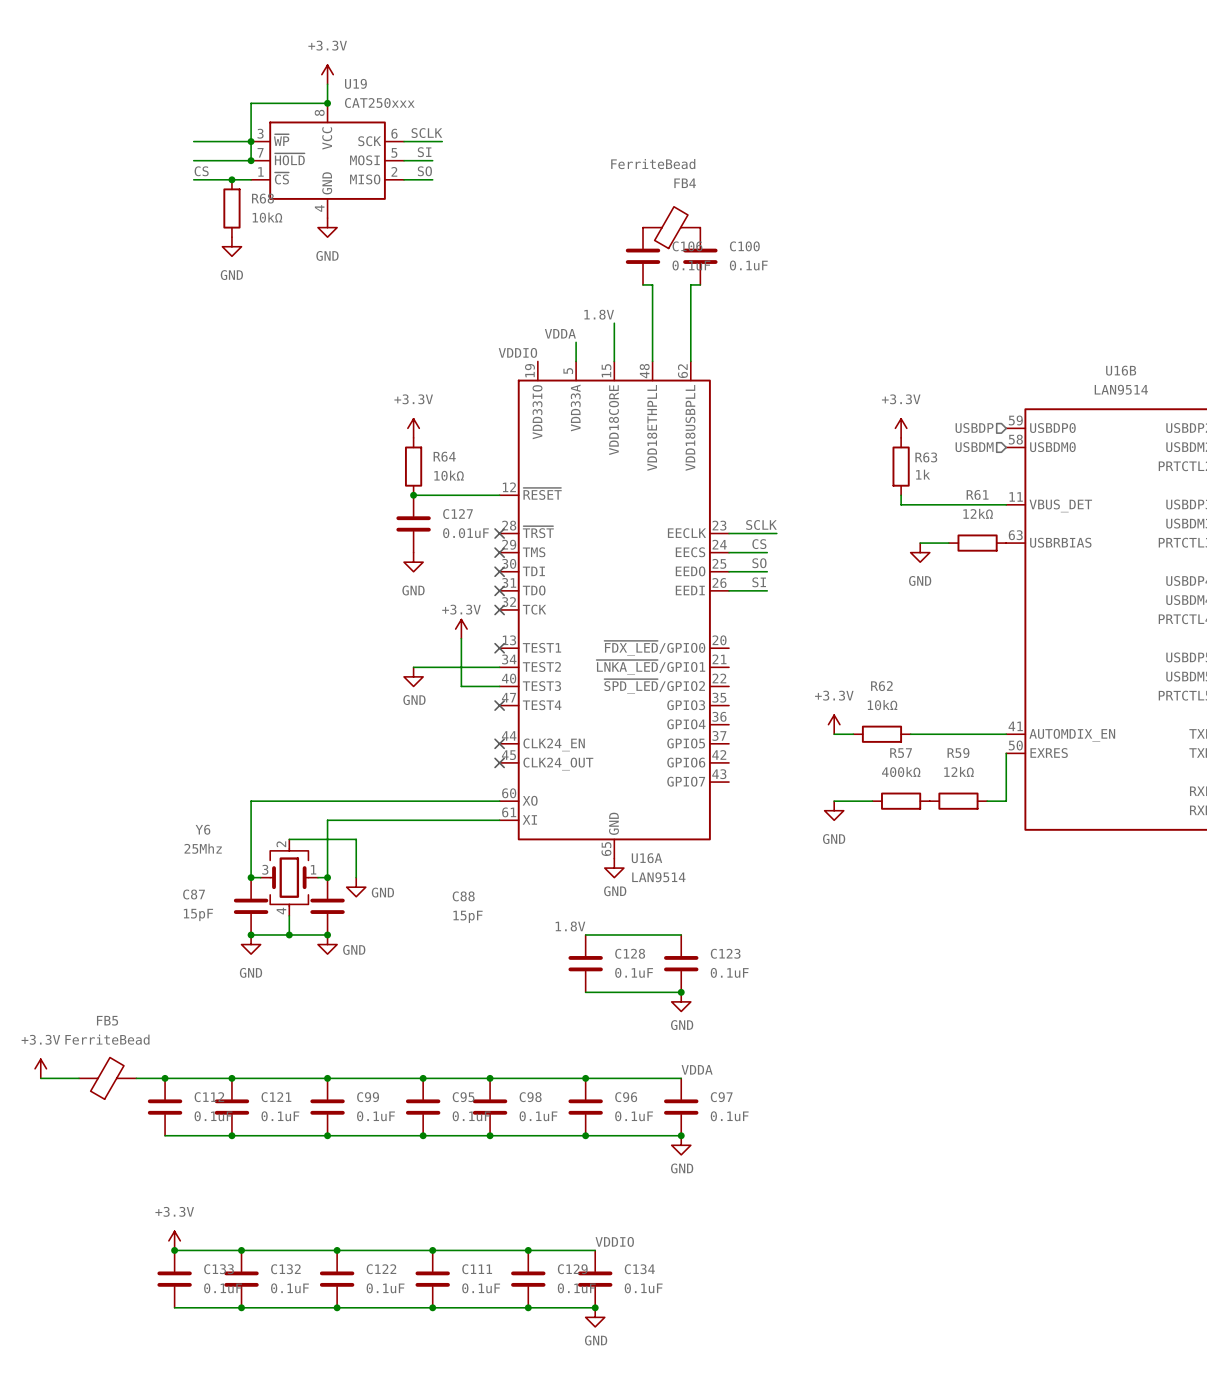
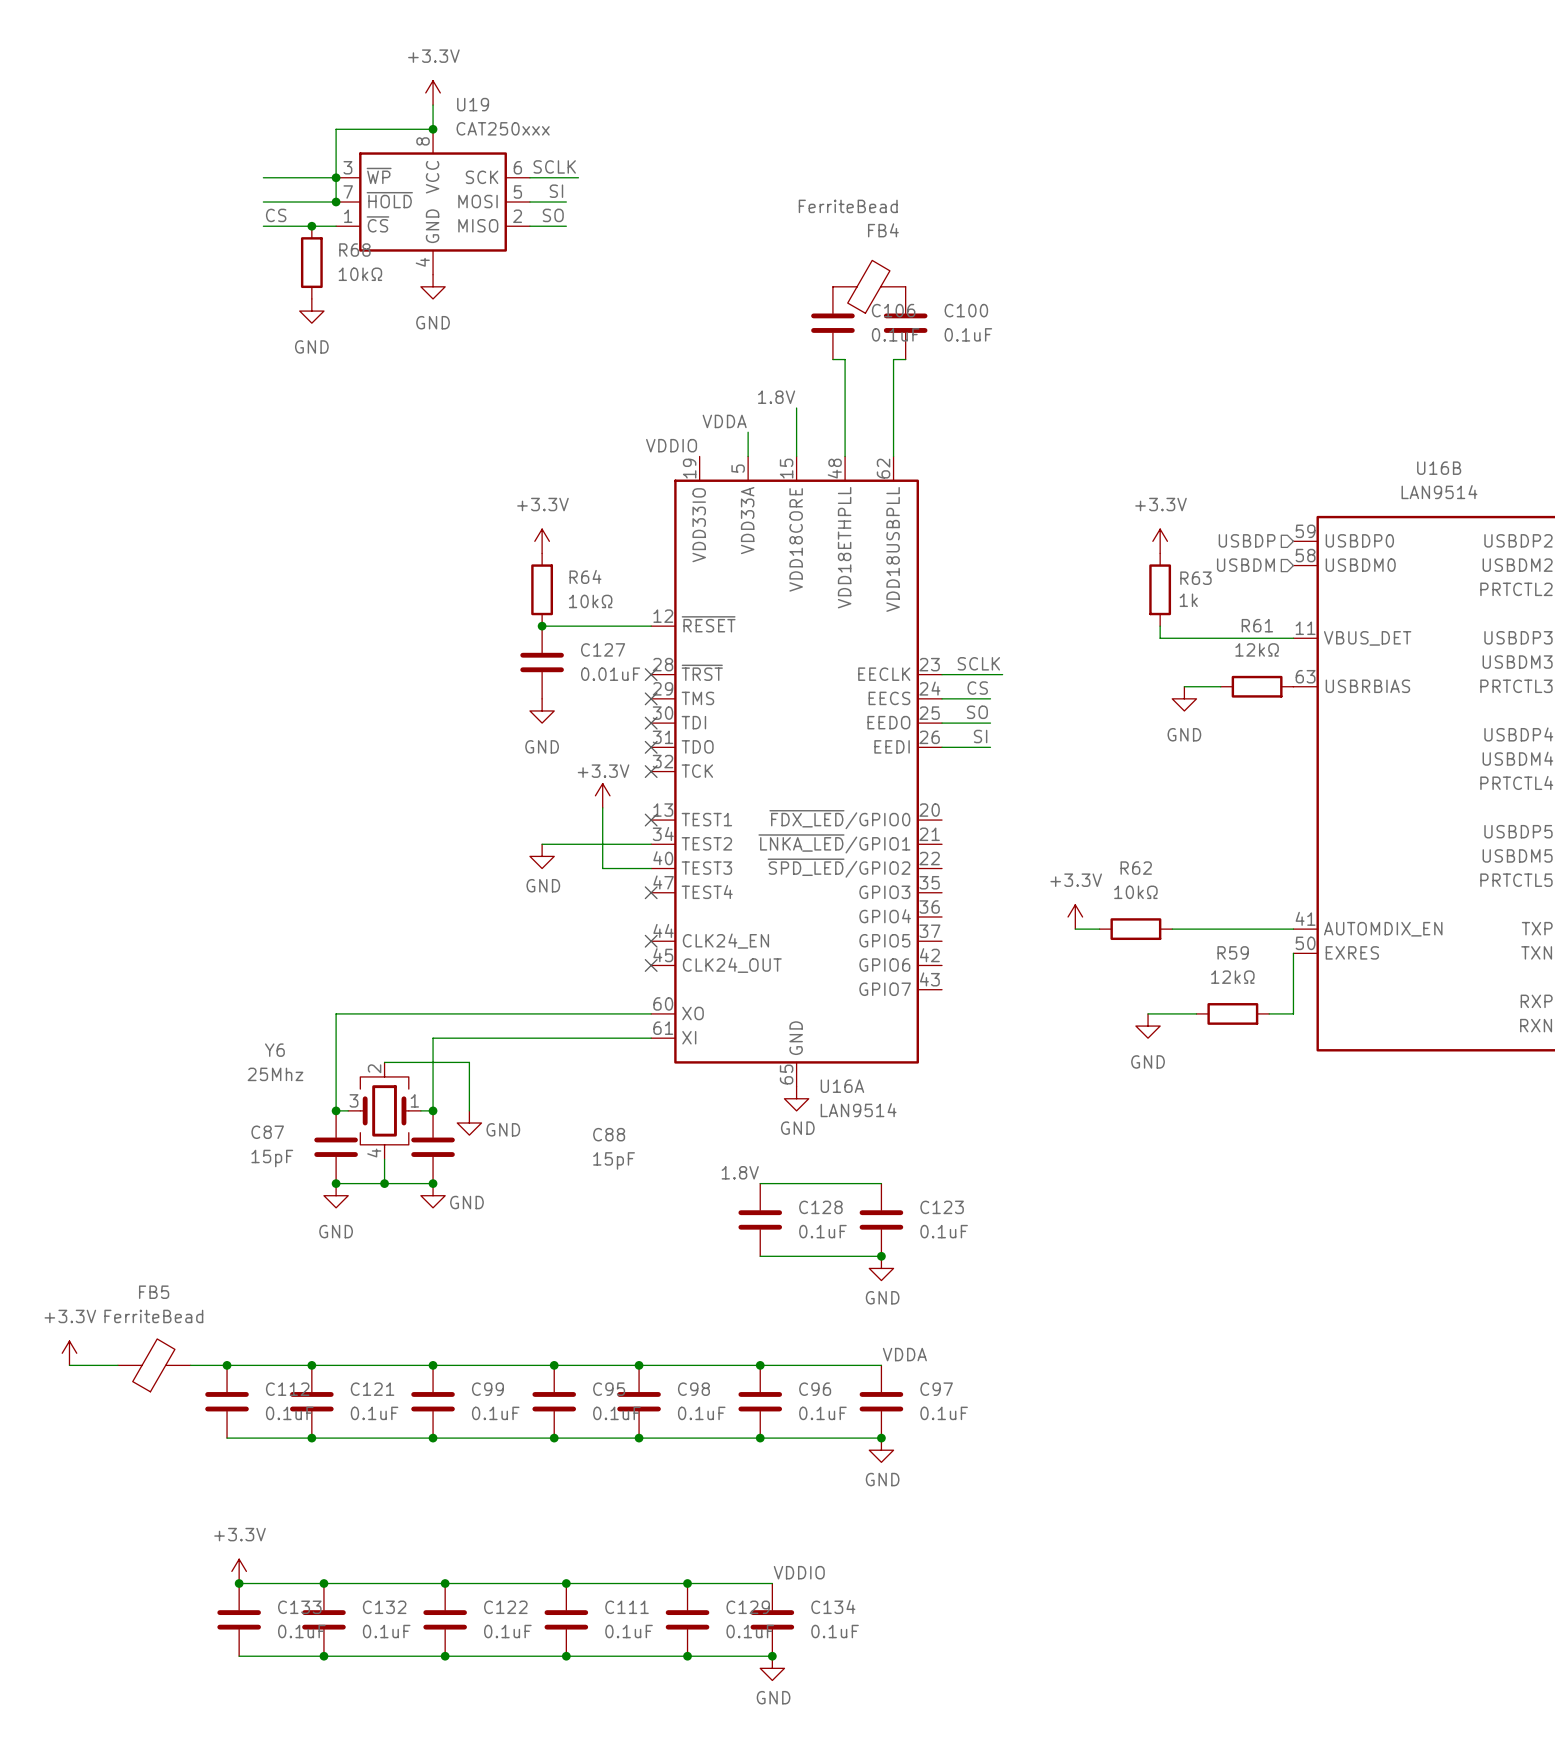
wire: (834, 801) (872, 801) -> (1148, 1013) (1196, 1013)
R57: 400kΩ (901, 801) -> none
power symbol position: GND (834, 810) -> GND (1148, 1026)

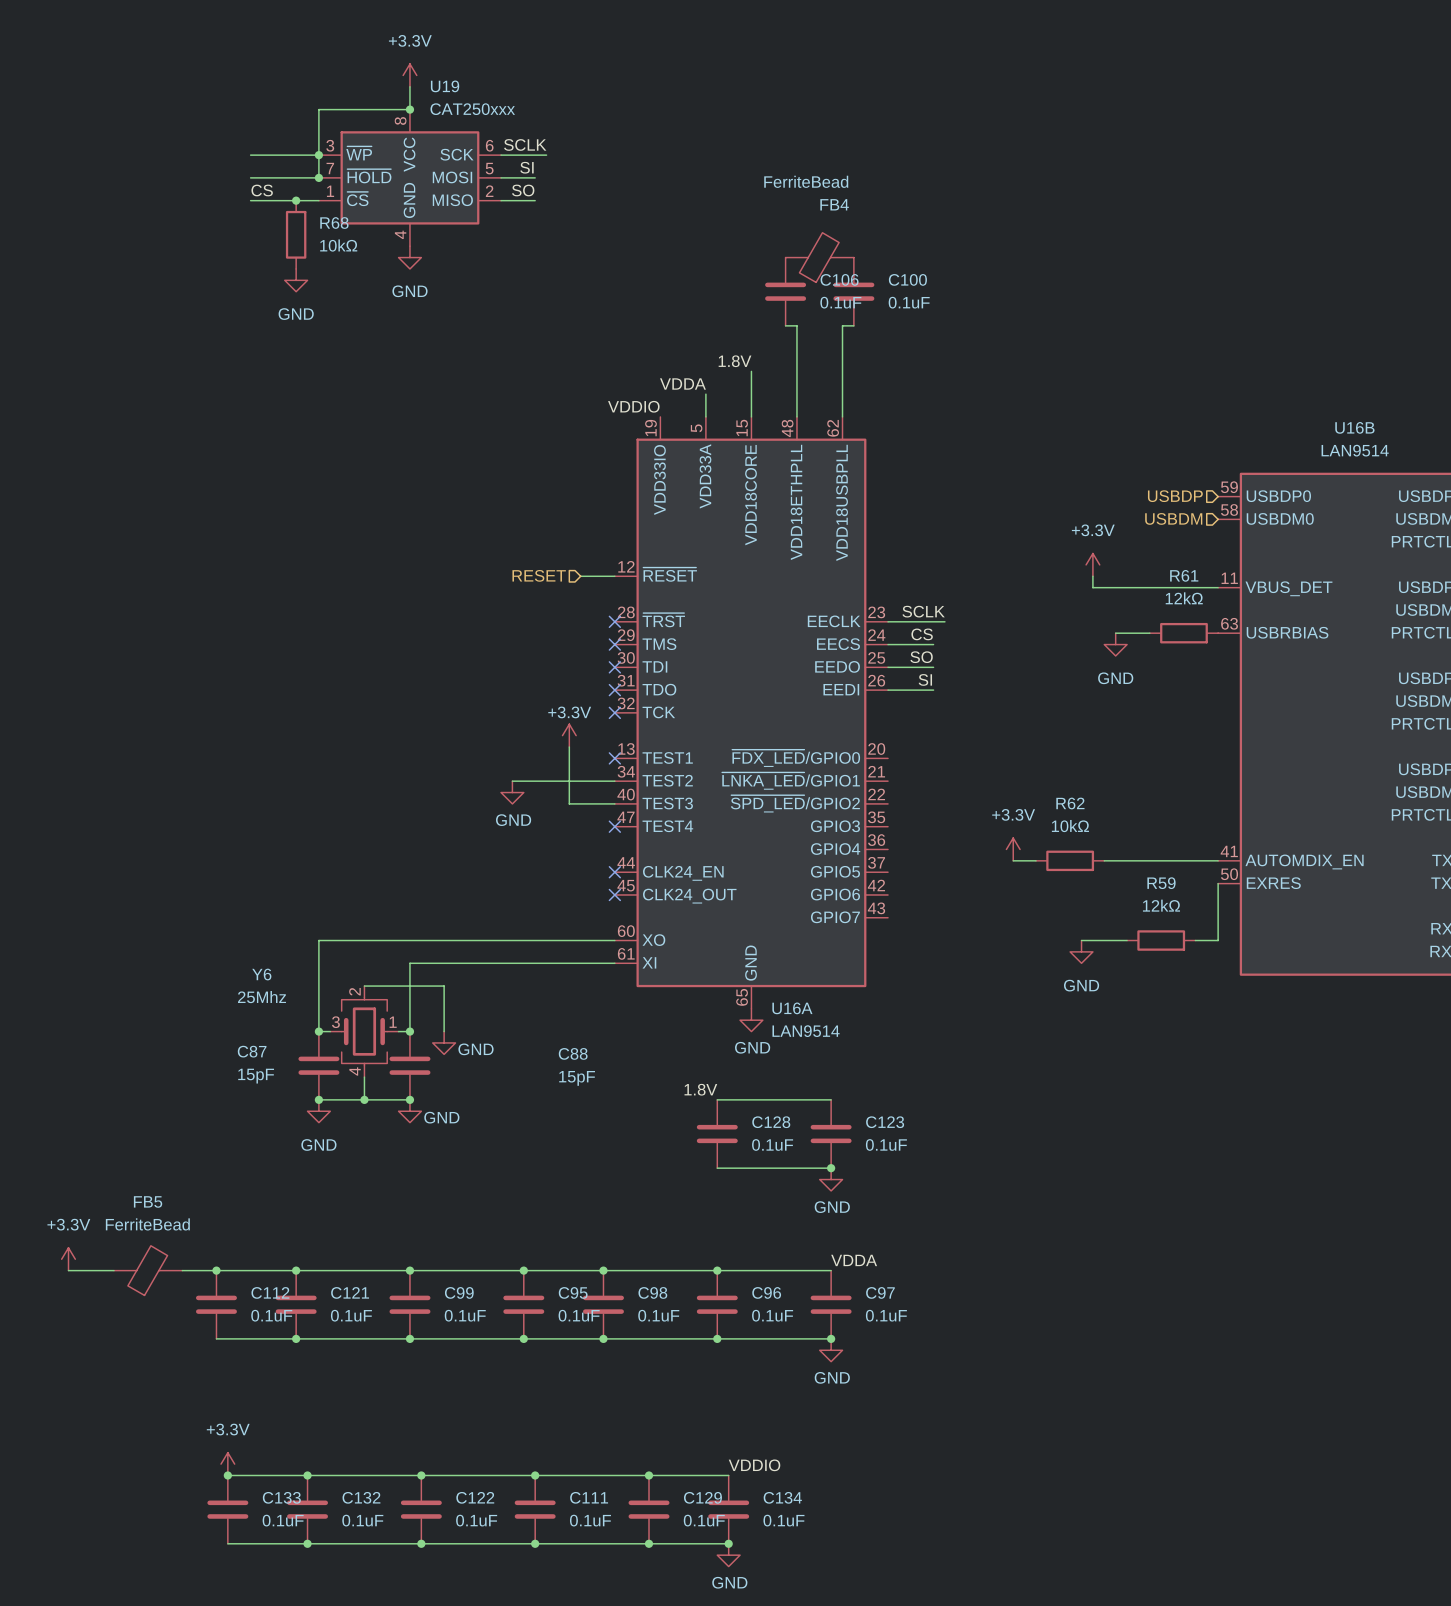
power symbol: +3.3V (542, 541) -> none
power symbol position: +3.3V (1160, 541) -> +3.3V (1092, 564)
R64: 10kΩ (542, 589) -> none
R63: 1k (1160, 589) -> none
hierarchical label: none -> RESET (539, 575)
wire: (542, 626) (614, 626) -> none
junction: (542, 626) -> none
C127: 0.01uF (542, 662) -> none
power symbol: GND (542, 710) -> none

